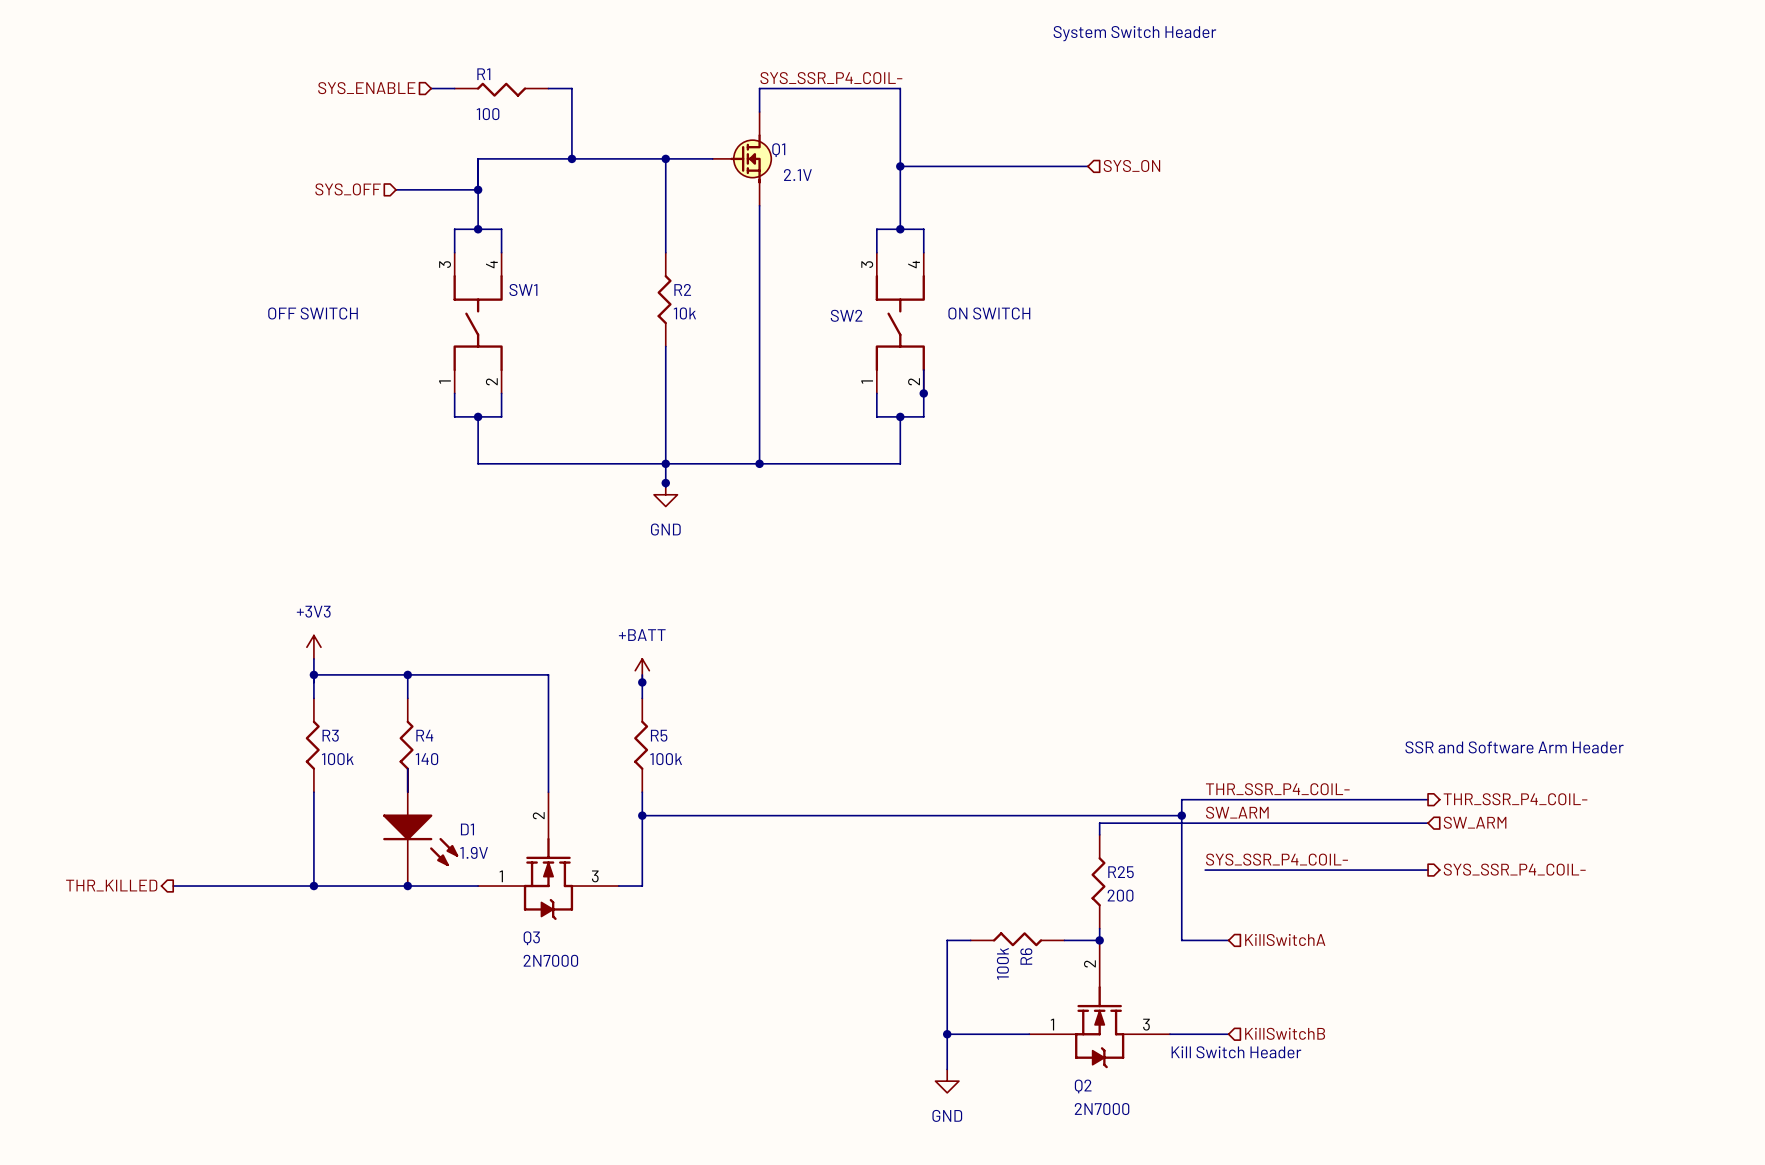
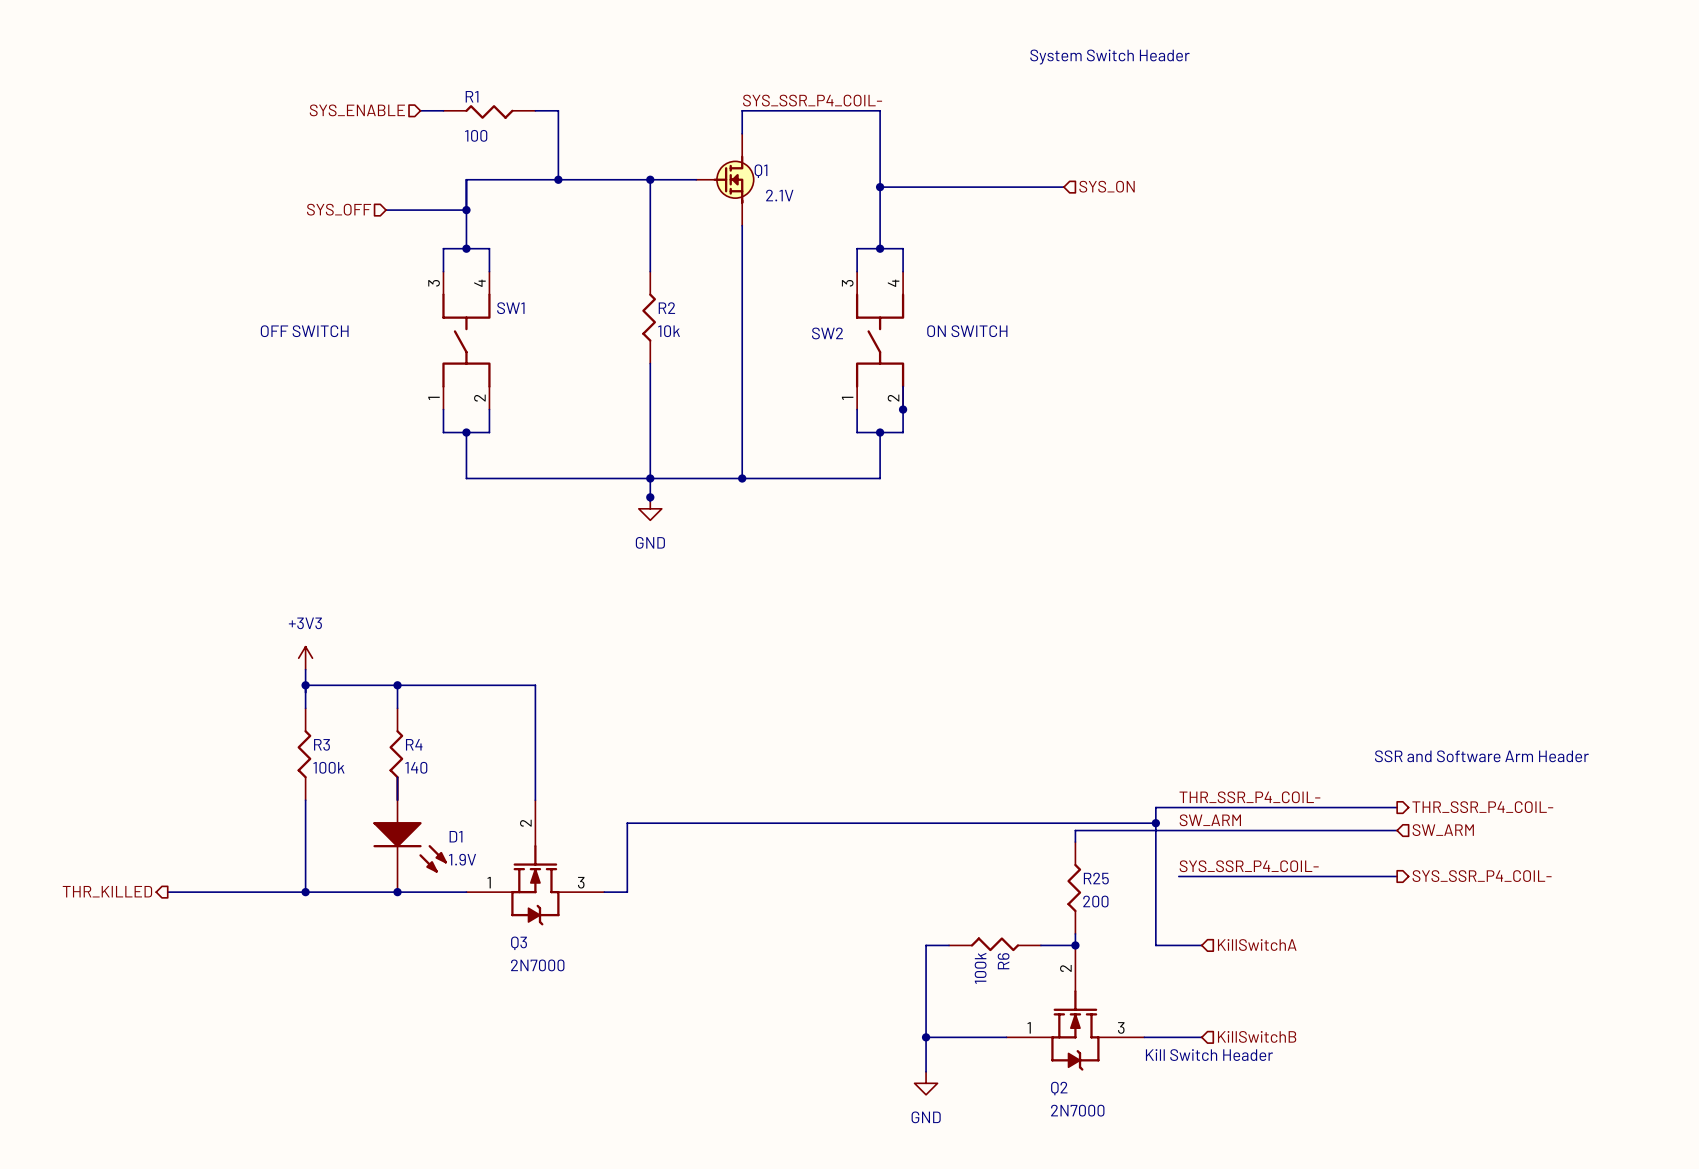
power symbol: +BATT (642, 670) -> none
wire: (642, 674) (642, 698) -> none
junction: (642, 682) -> none
R5: 100k (641, 745) -> none
wire: (642, 792) (642, 815) -> none
junction: (642, 815) -> none

